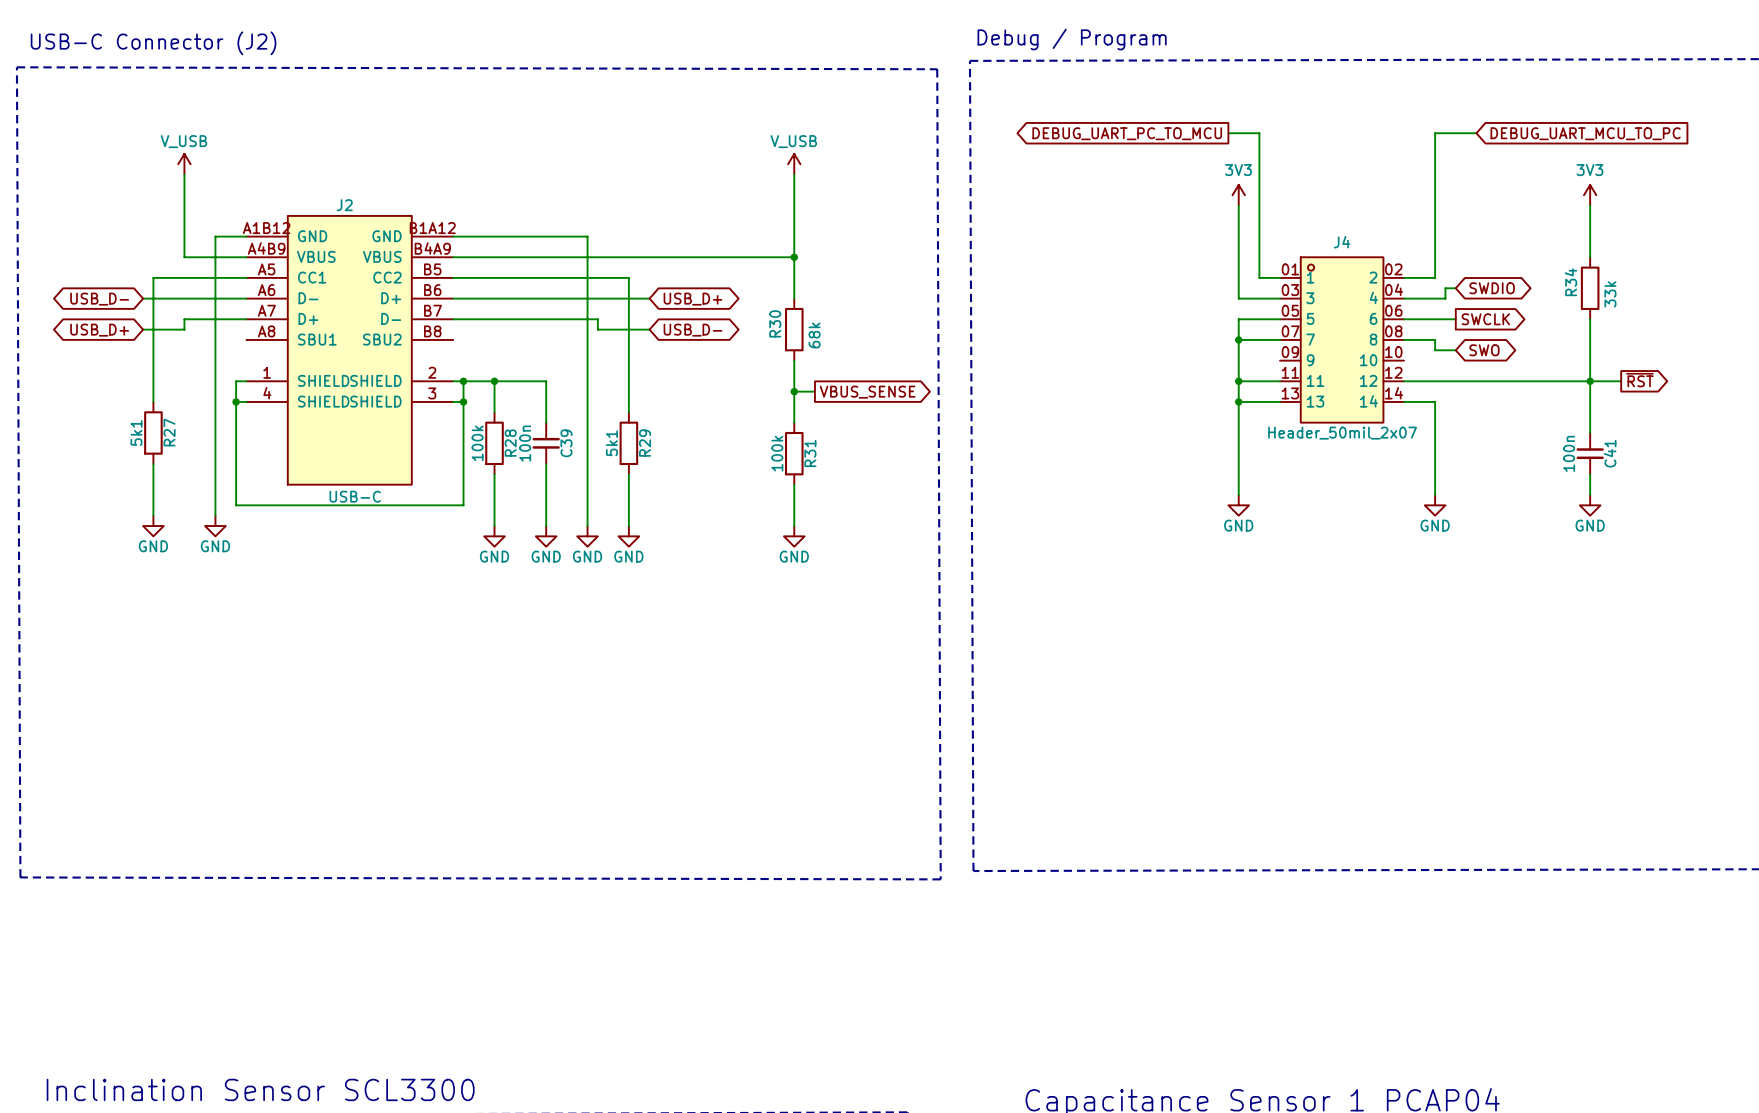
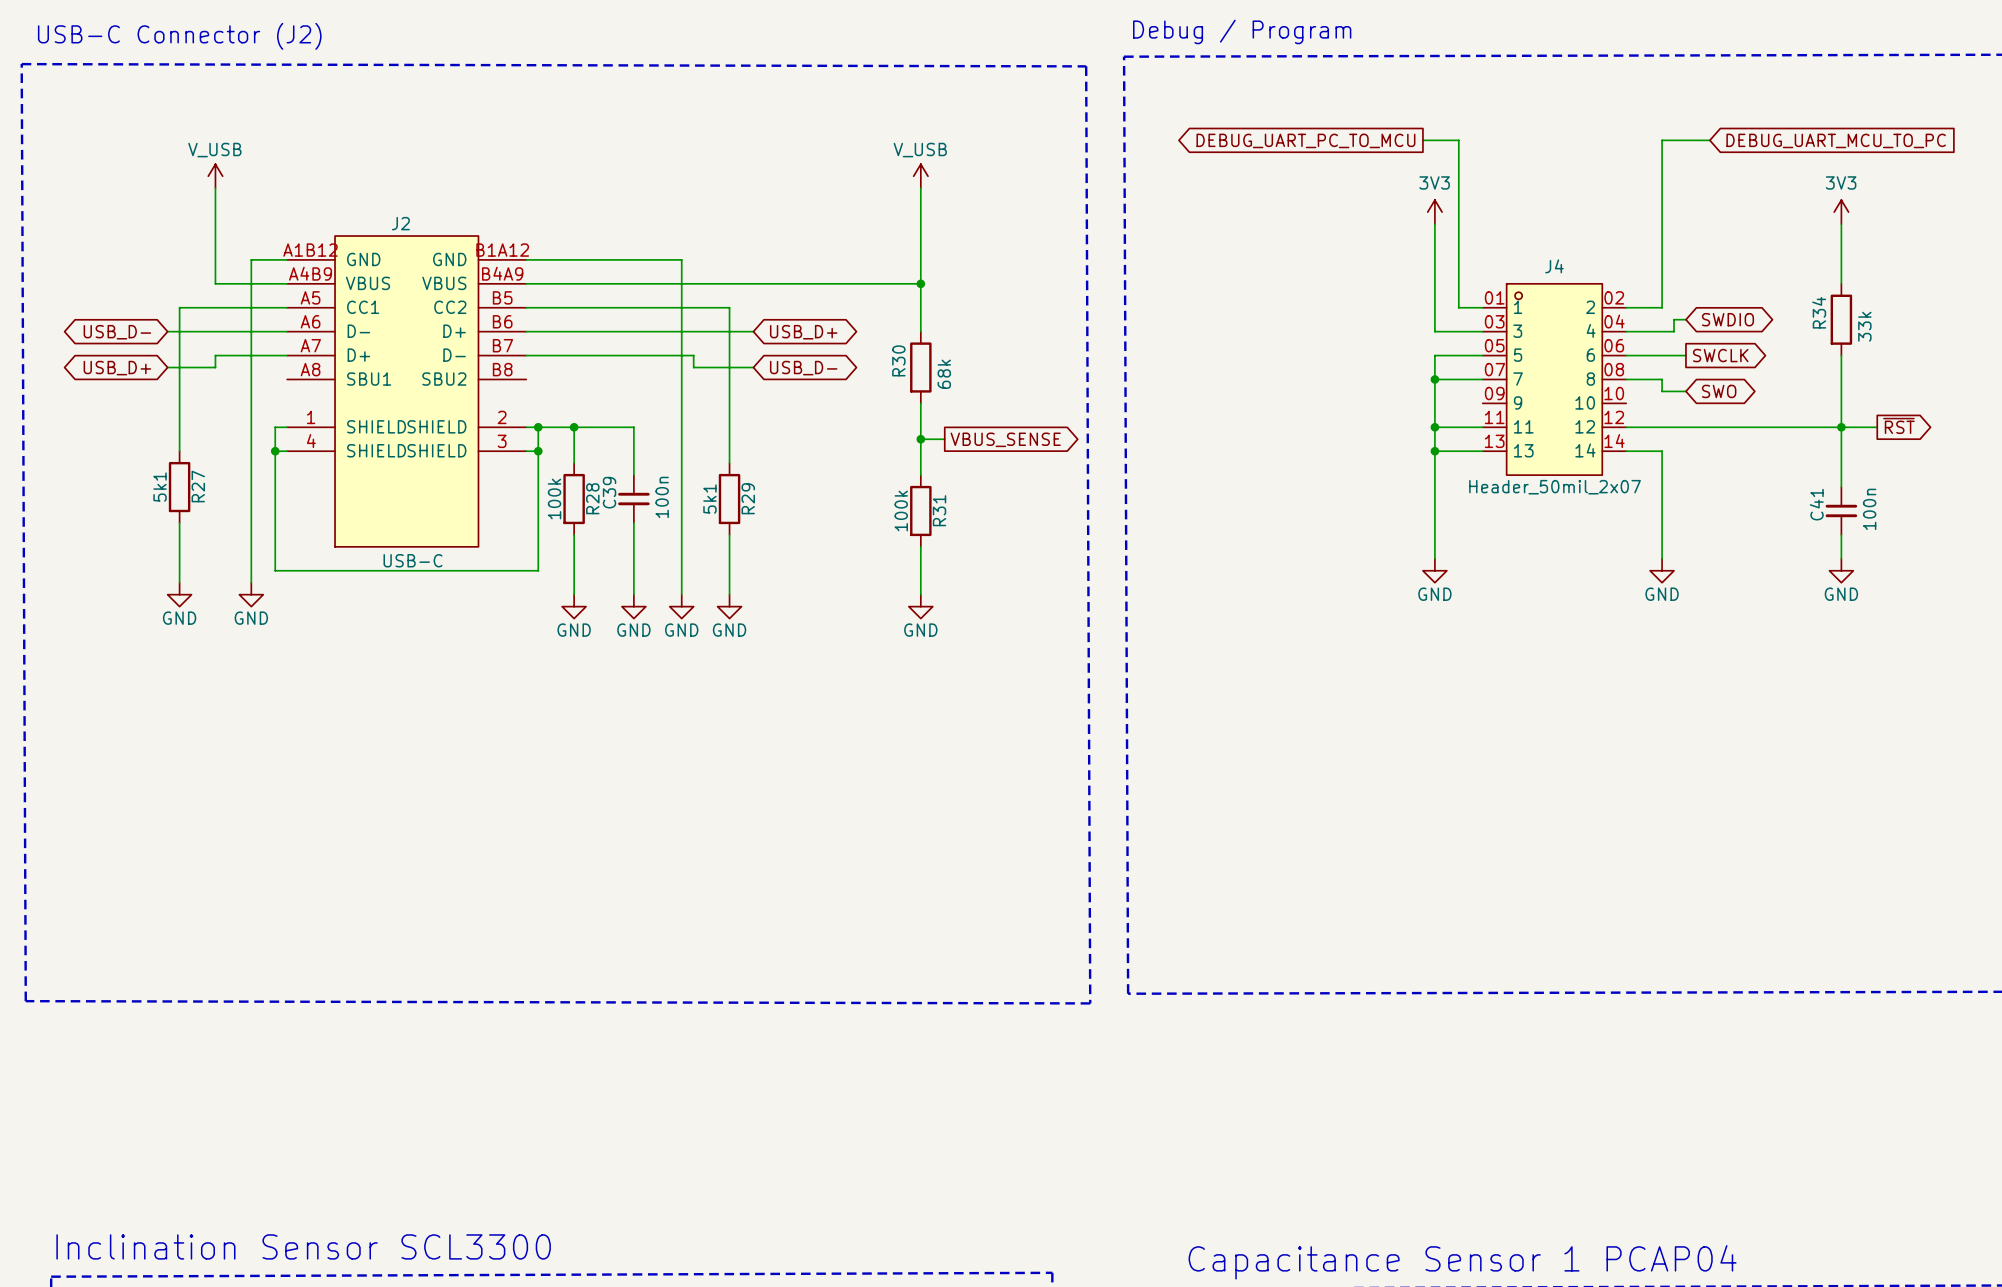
C39 value position: 100n (525, 443) -> 100n (662, 497)
C39 name position: C39 (566, 443) -> C39 (609, 492)
C41 value position: 100n (1569, 453) -> 100n (1869, 509)
C41 name position: C41 (1610, 453) -> C41 (1816, 504)

